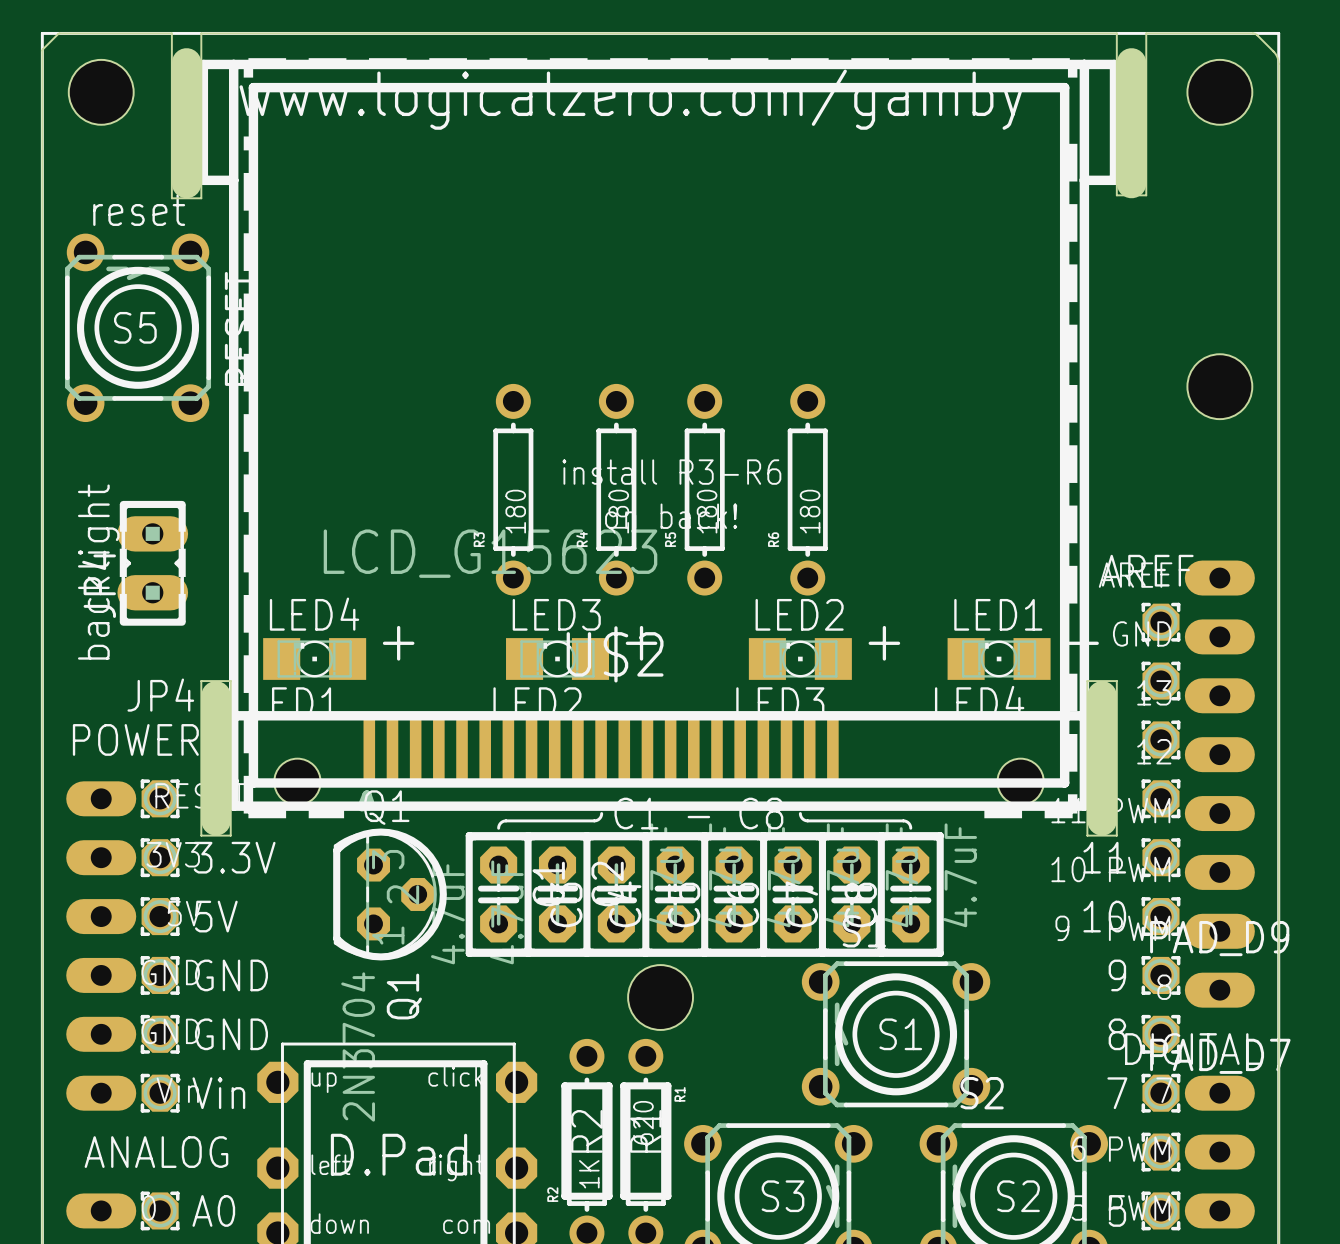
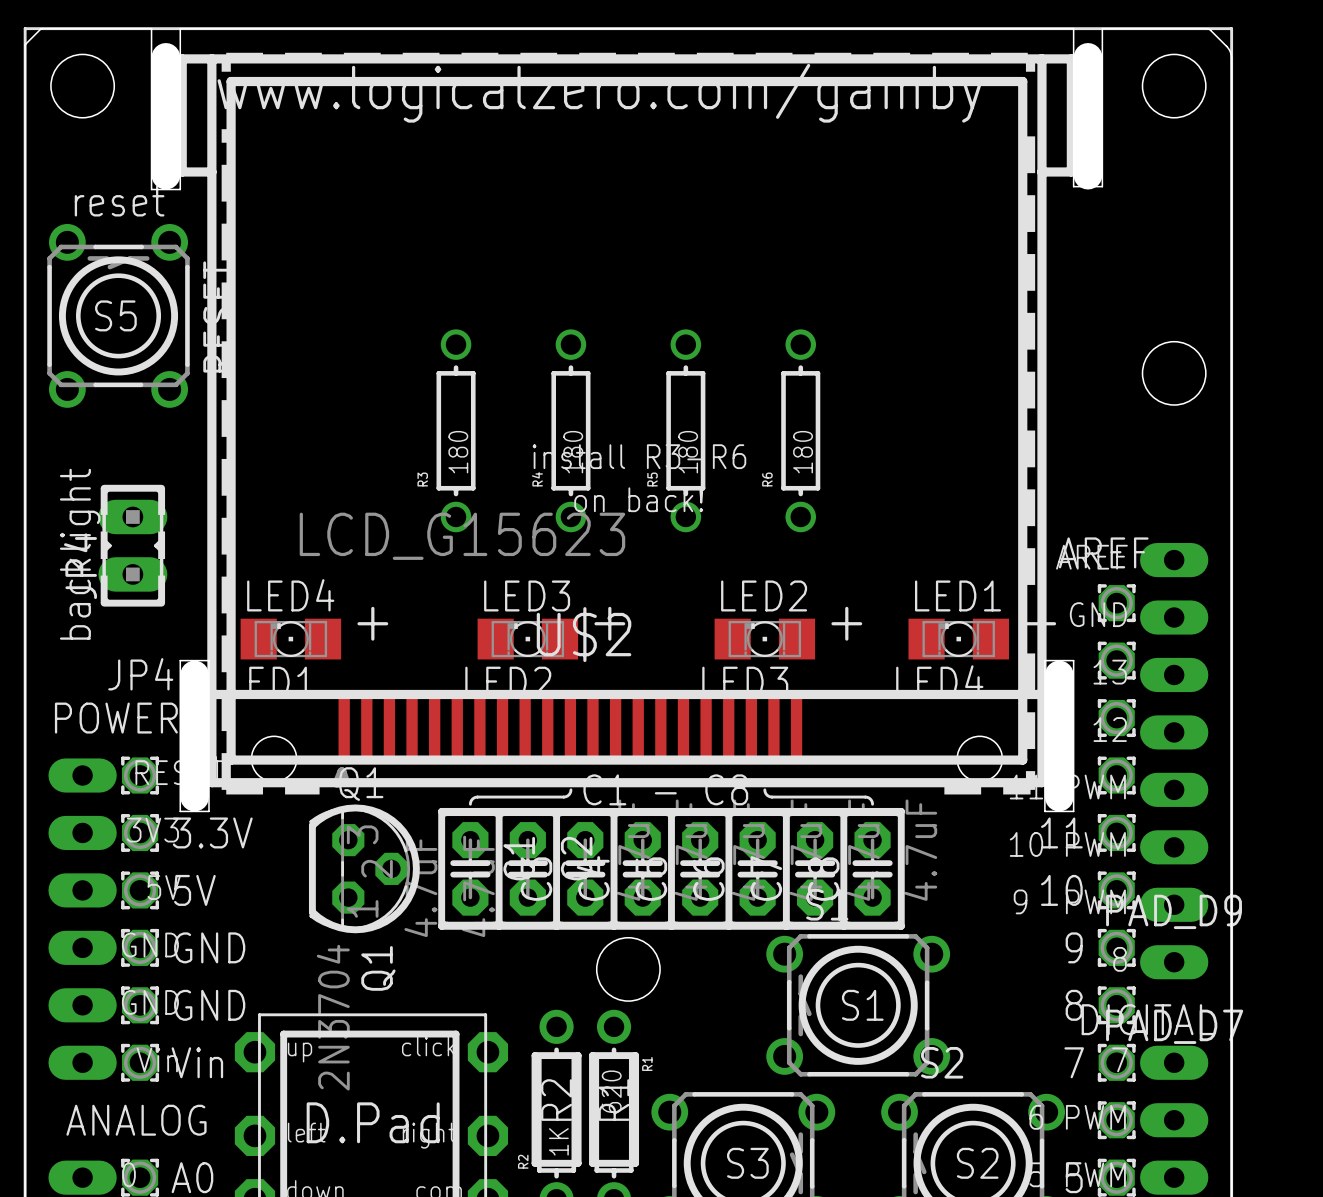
R3 footprint: [493, 383, 534, 596] -> [436, 329, 476, 533]
R4 footprint: [596, 383, 637, 596] -> [551, 329, 591, 533]
R5 footprint: [684, 383, 725, 596] -> [666, 329, 706, 533]
R6 footprint: [787, 383, 828, 596] -> [781, 329, 821, 533]

